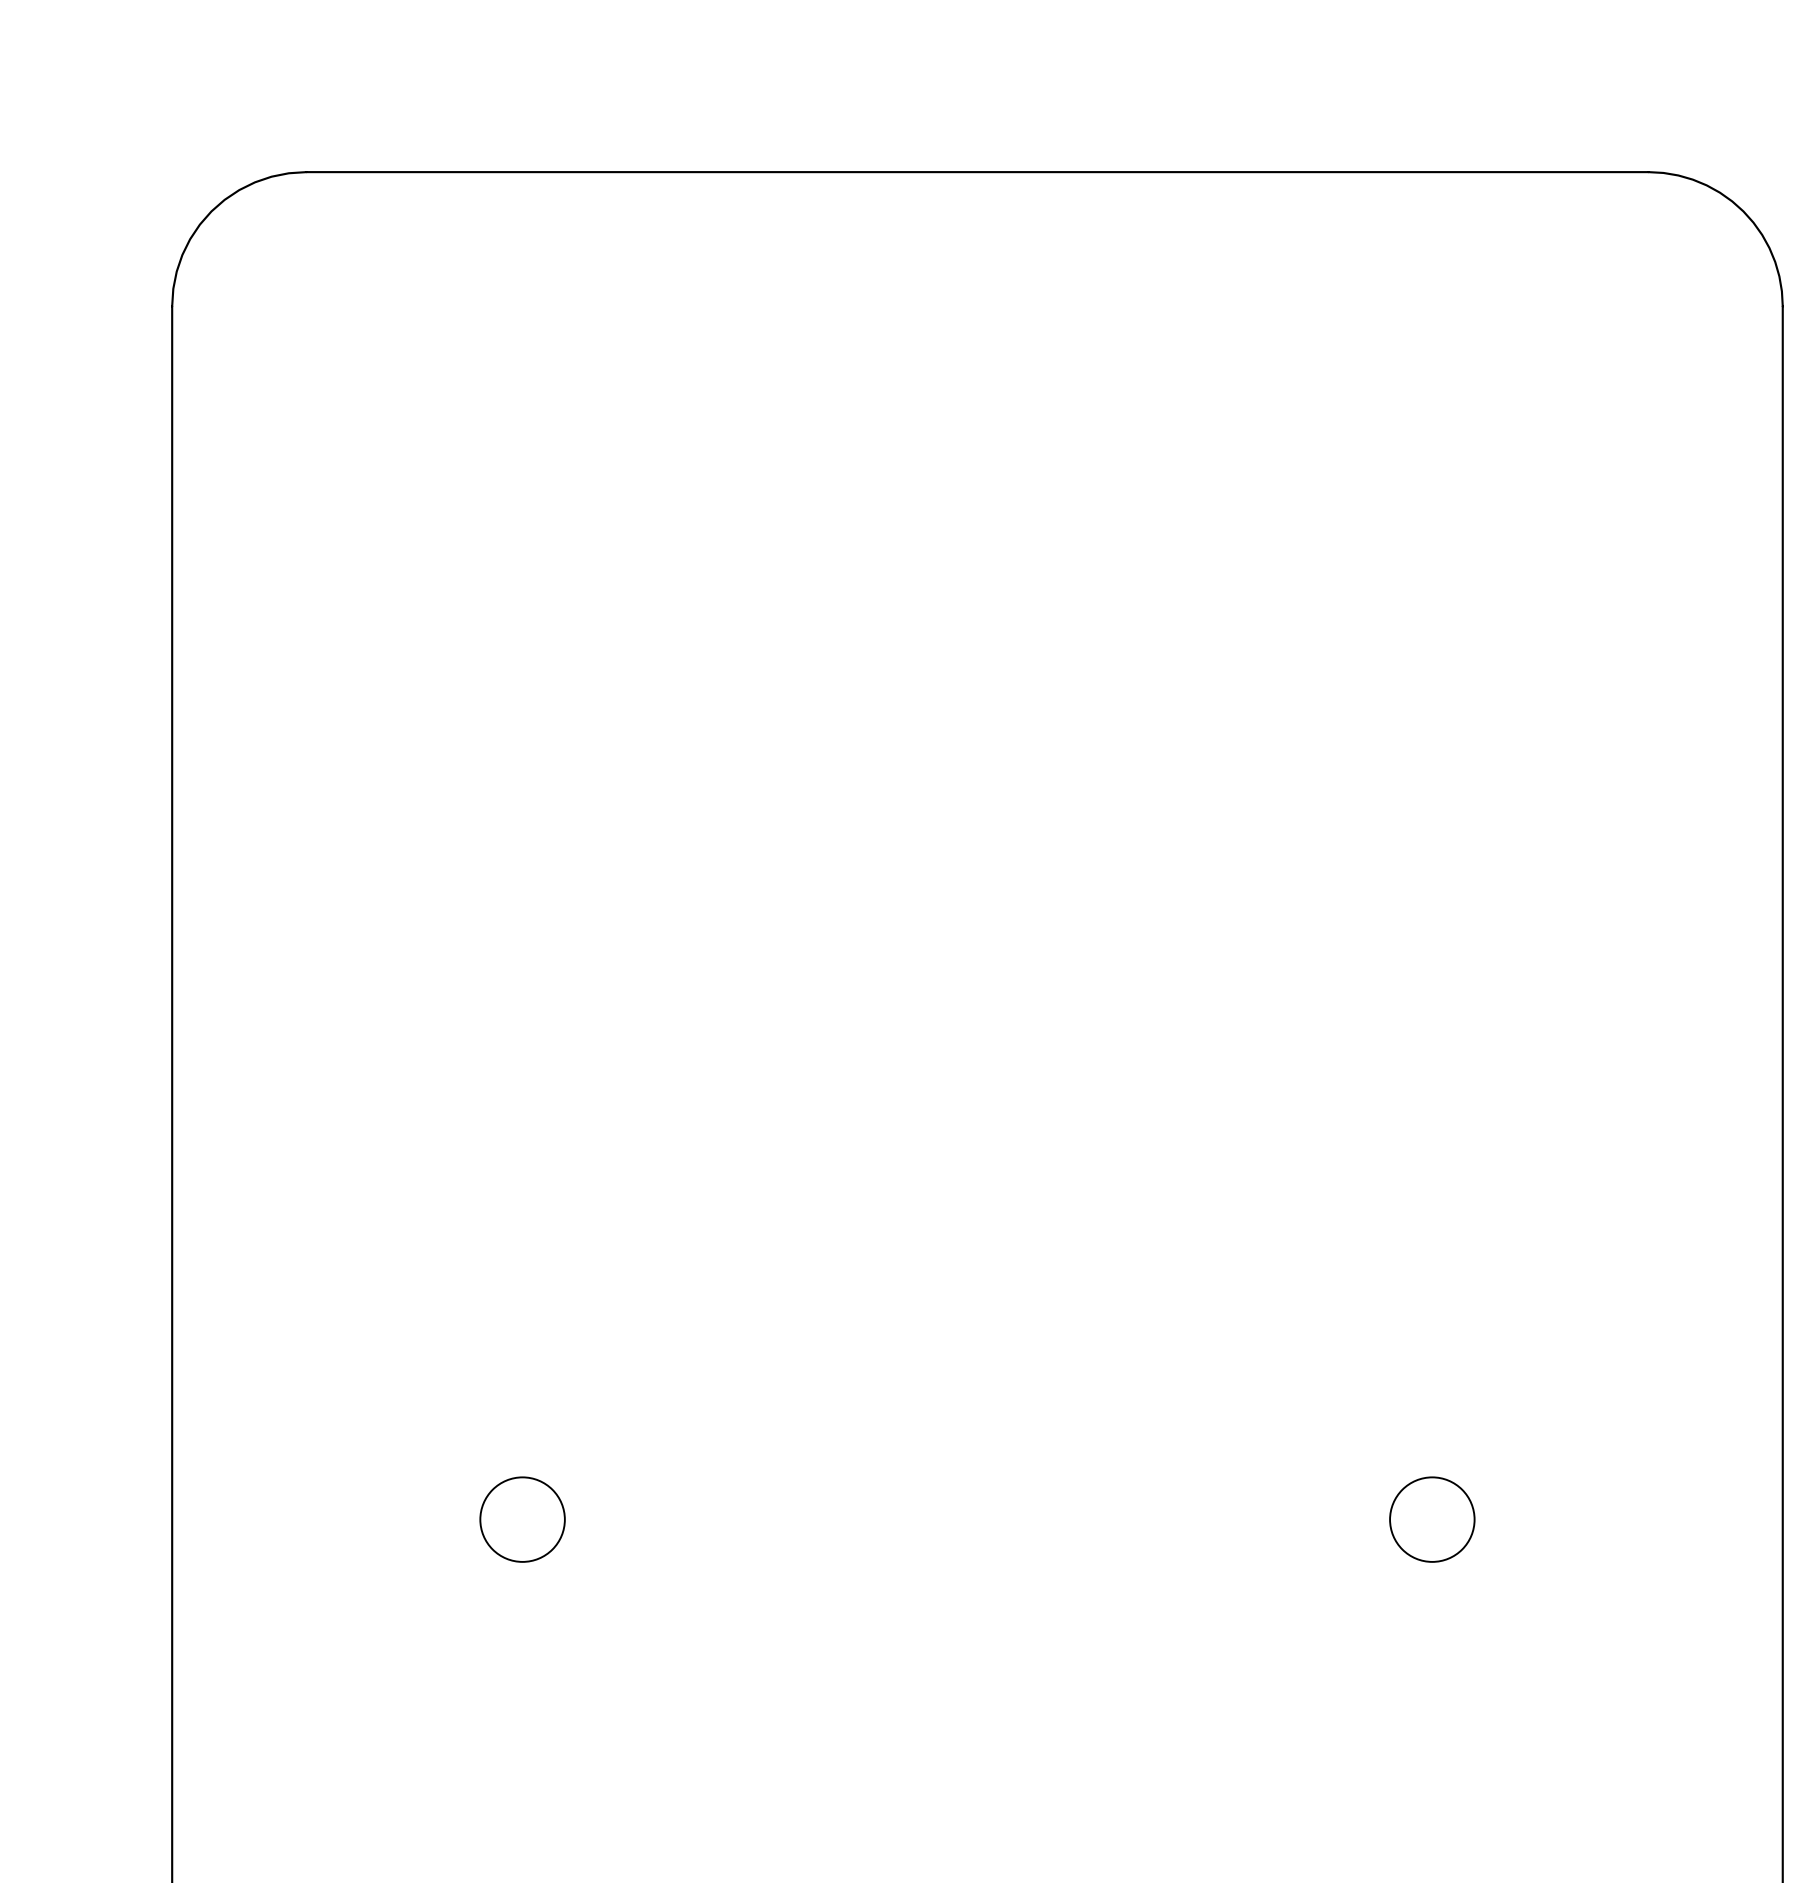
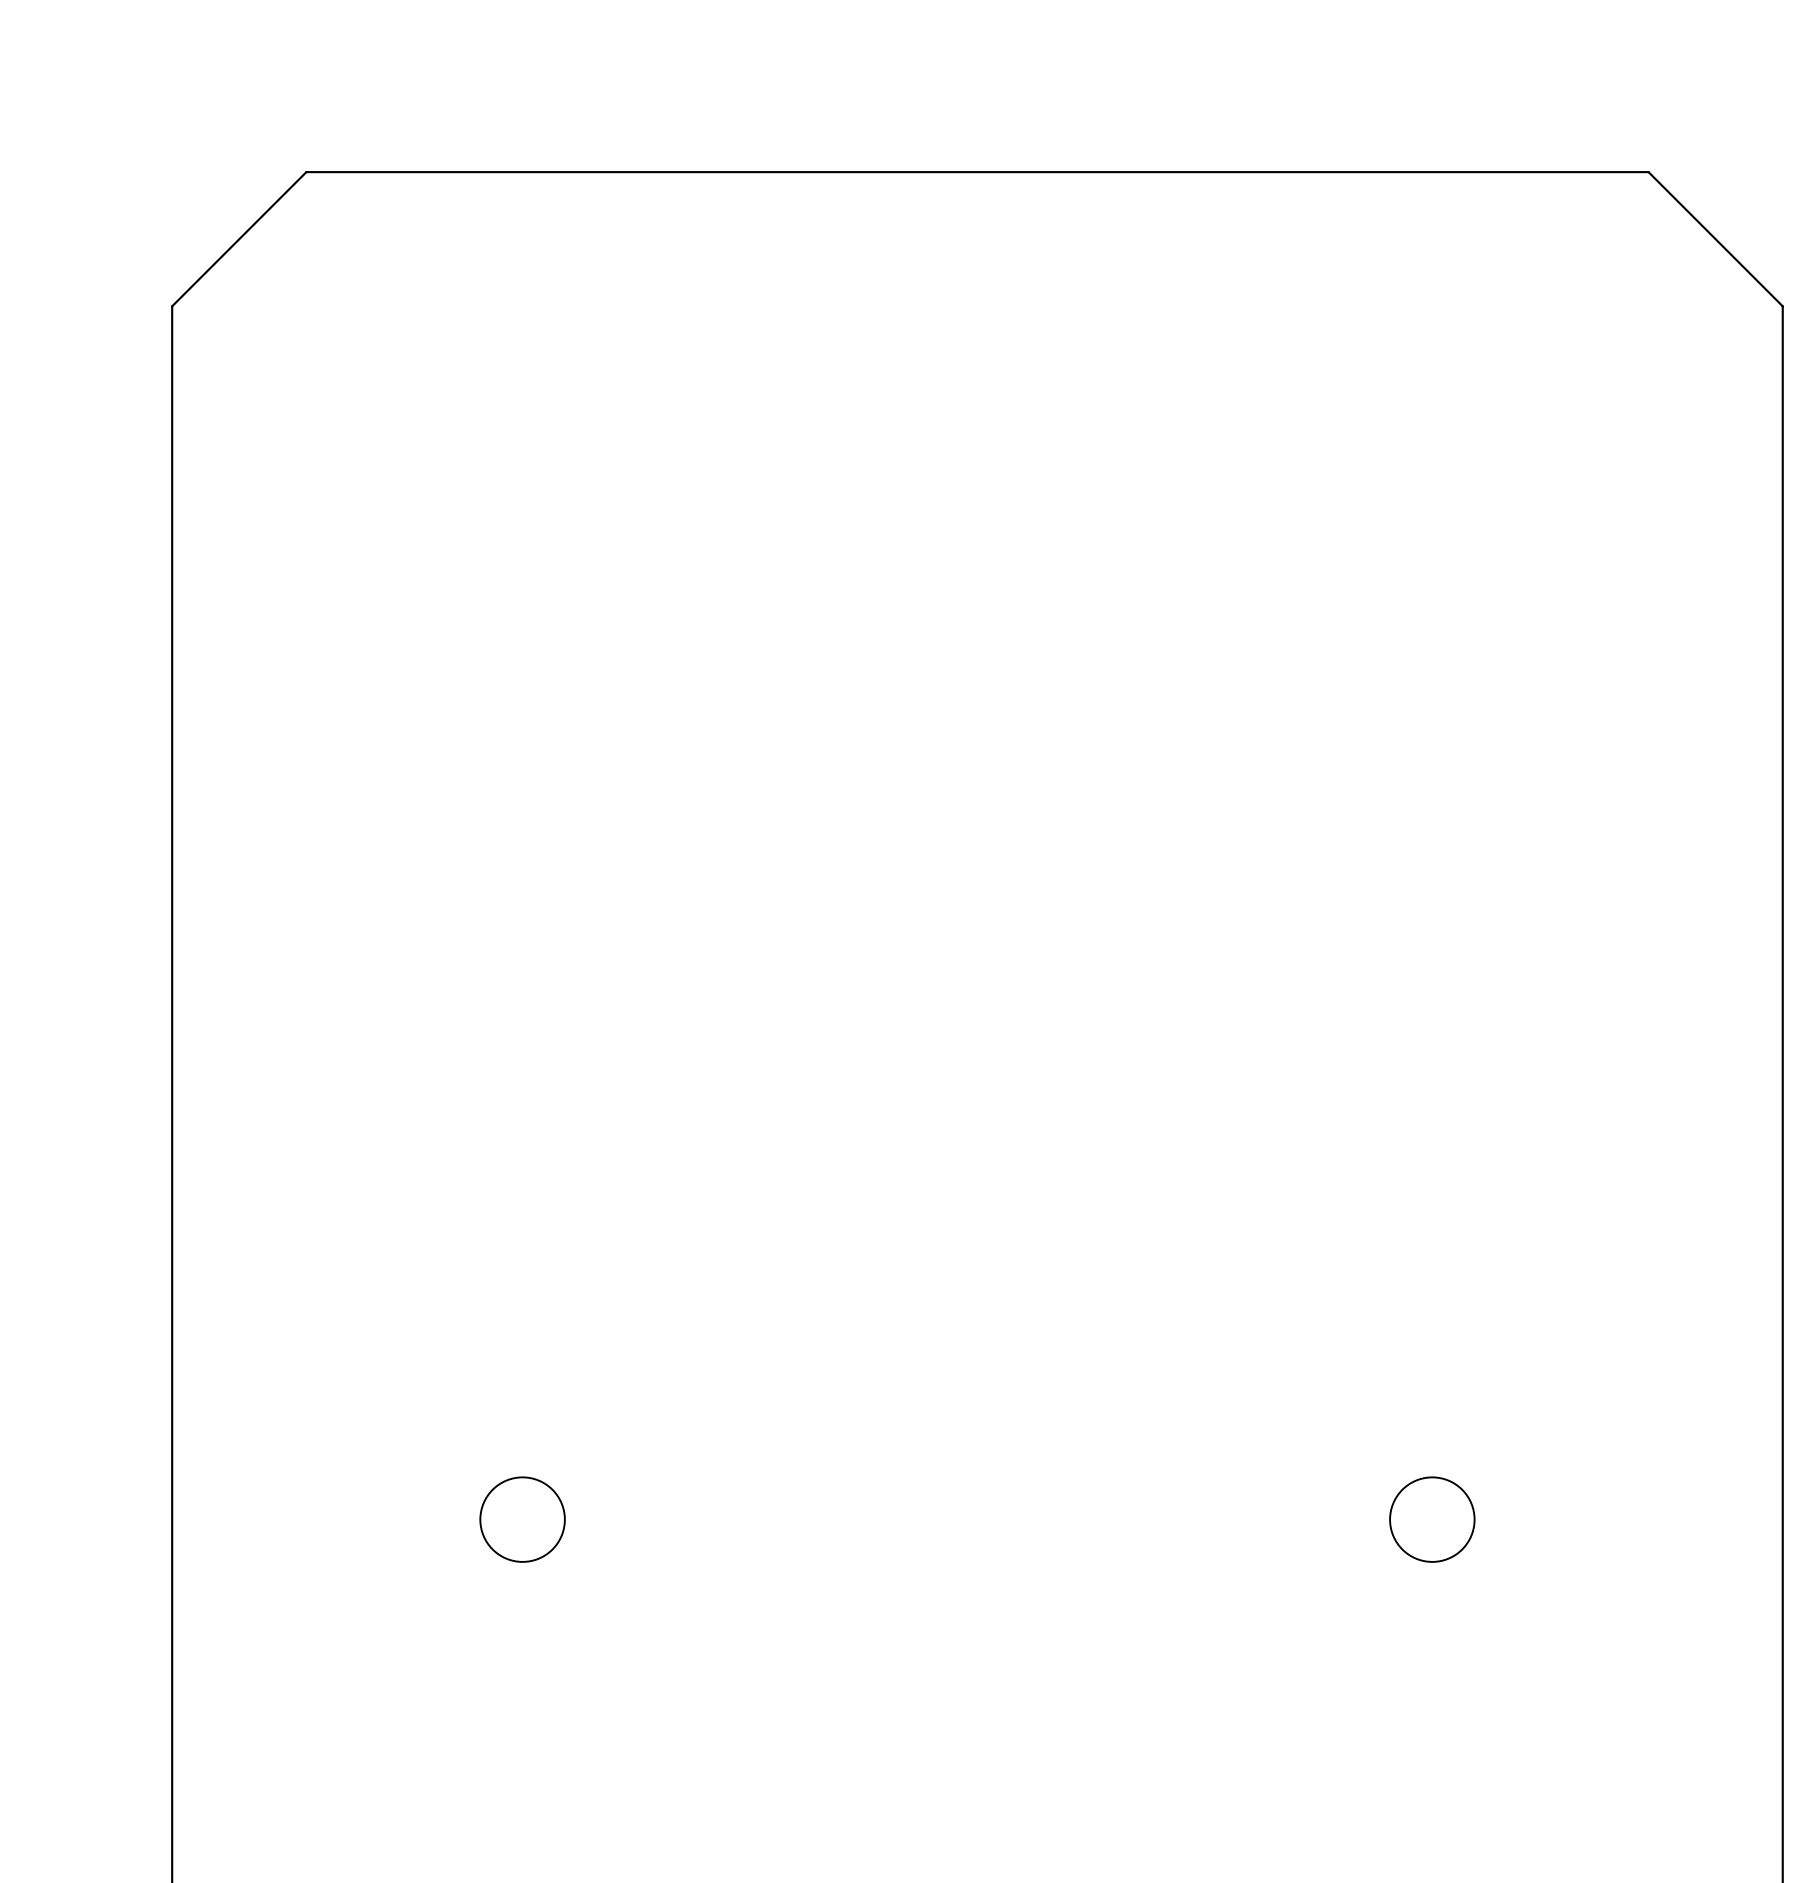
board edge: (306, 172) (271, 176) (255, 182) (239, 190) (211, 211) (199, 224) (182, 254) (176, 271) (172, 306) -> (306, 172) (172, 306)
board edge: (1648, 172) (1663, 172) (1692, 179) (1719, 192) (1743, 211) (1762, 234) (1769, 248) (1779, 276) (1782, 306) -> (1648, 172) (1782, 306)

